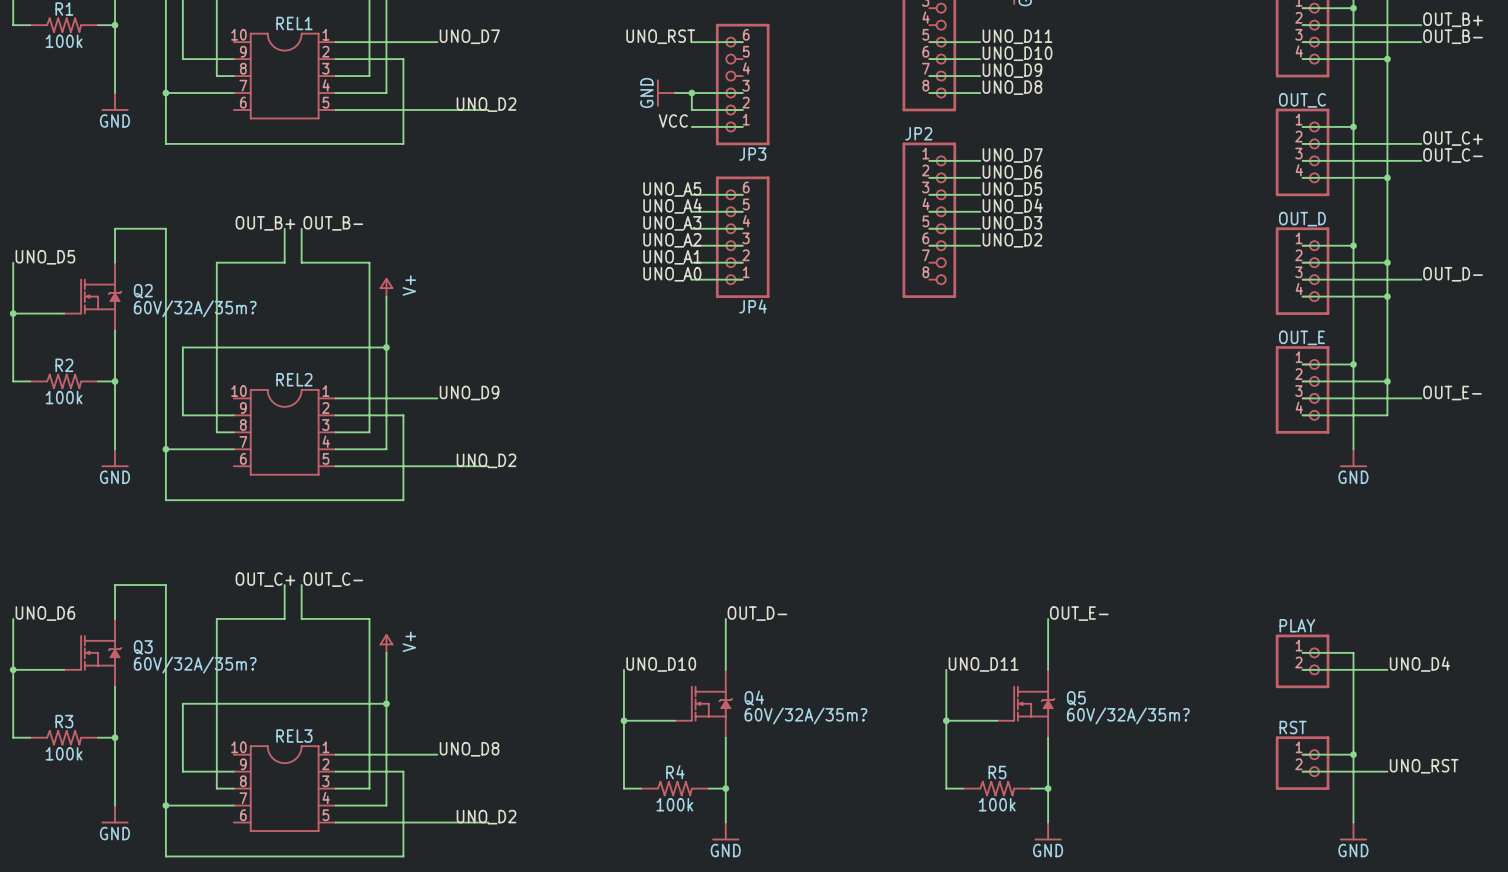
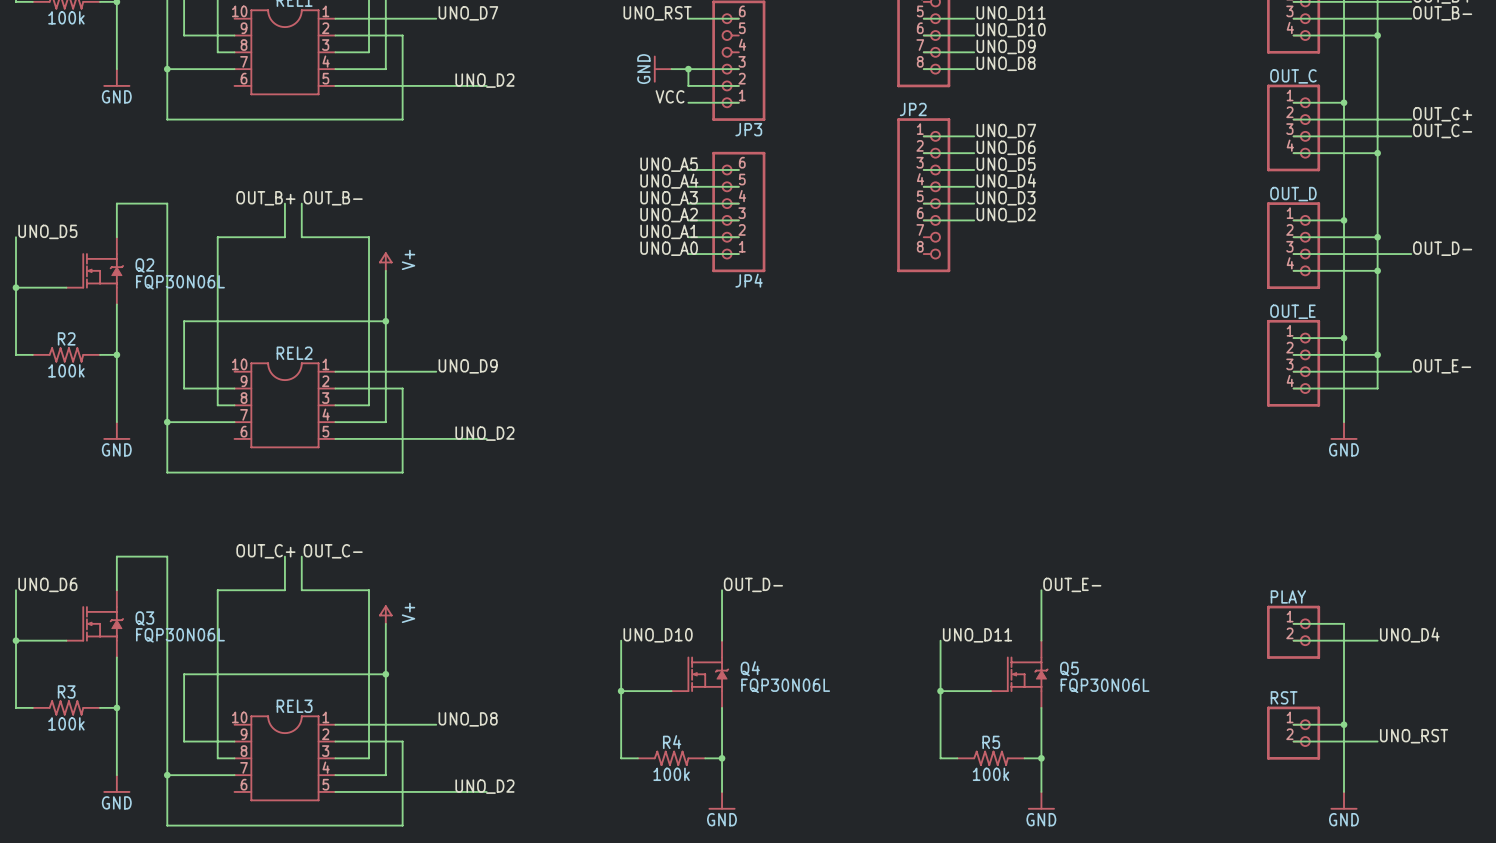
Q2 value: 60V/32A/35m? (195, 308) -> FQP30N06L (180, 282)
Q3 value: 60V/32A/35m? (195, 665) -> FQP30N06L (180, 635)
Q4 value: 60V/32A/35m? (805, 715) -> FQP30N06L (785, 685)
Q5 value: 60V/32A/35m? (1128, 715) -> FQP30N06L (1104, 685)

